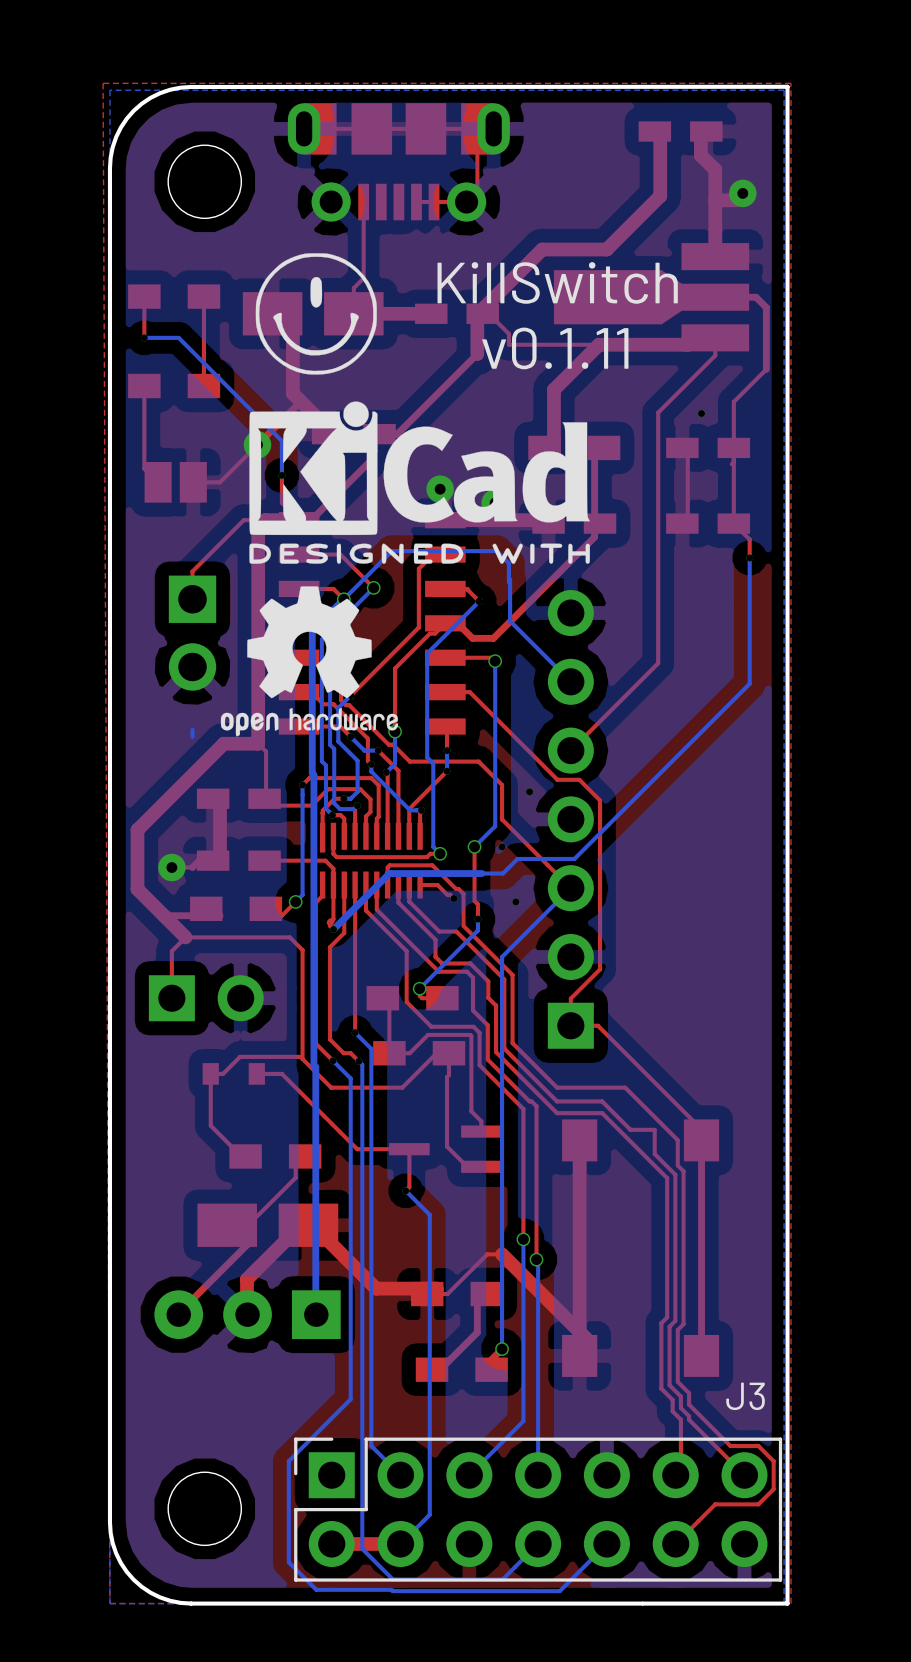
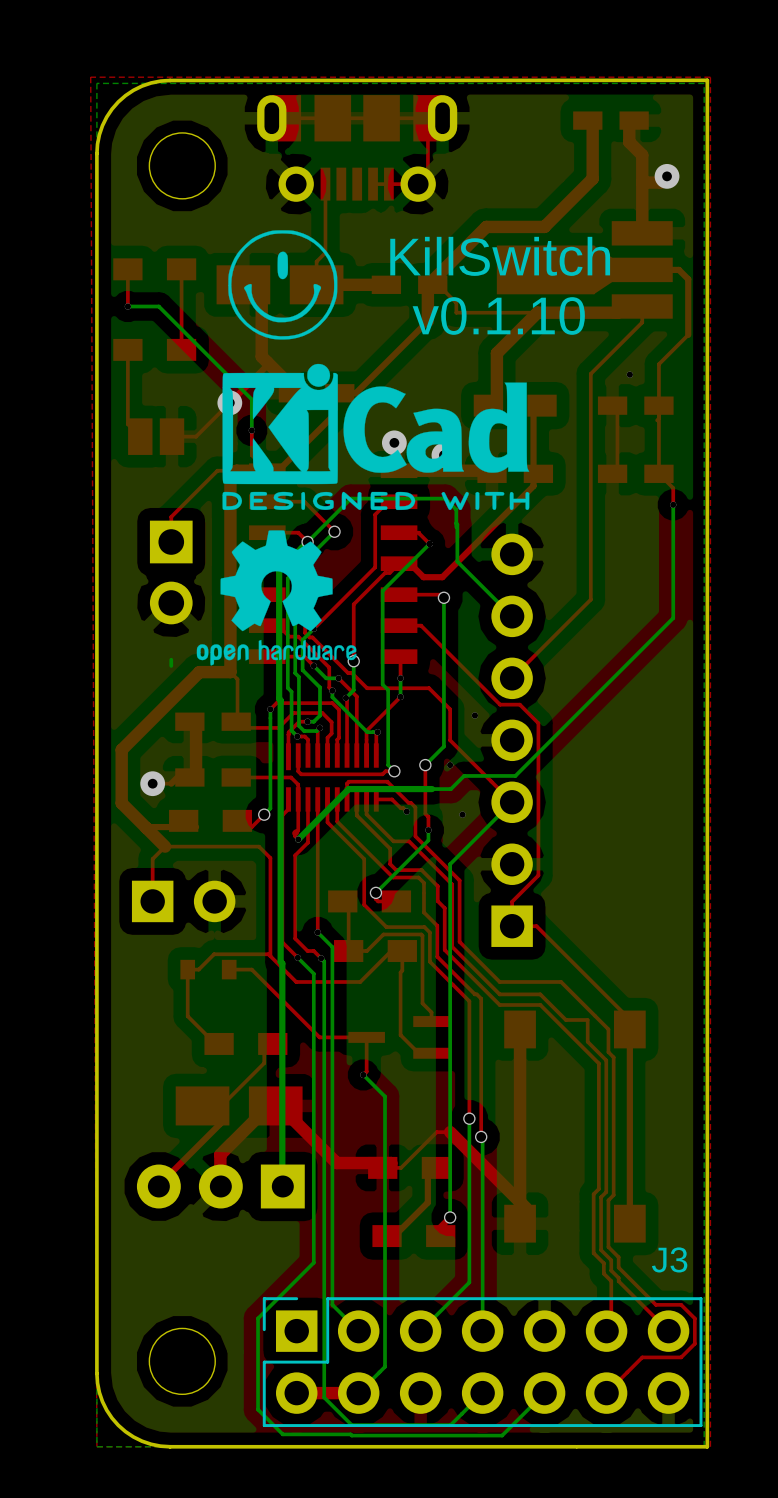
text: v0.1.11 (555, 348) -> v0.1.10 (498, 316)

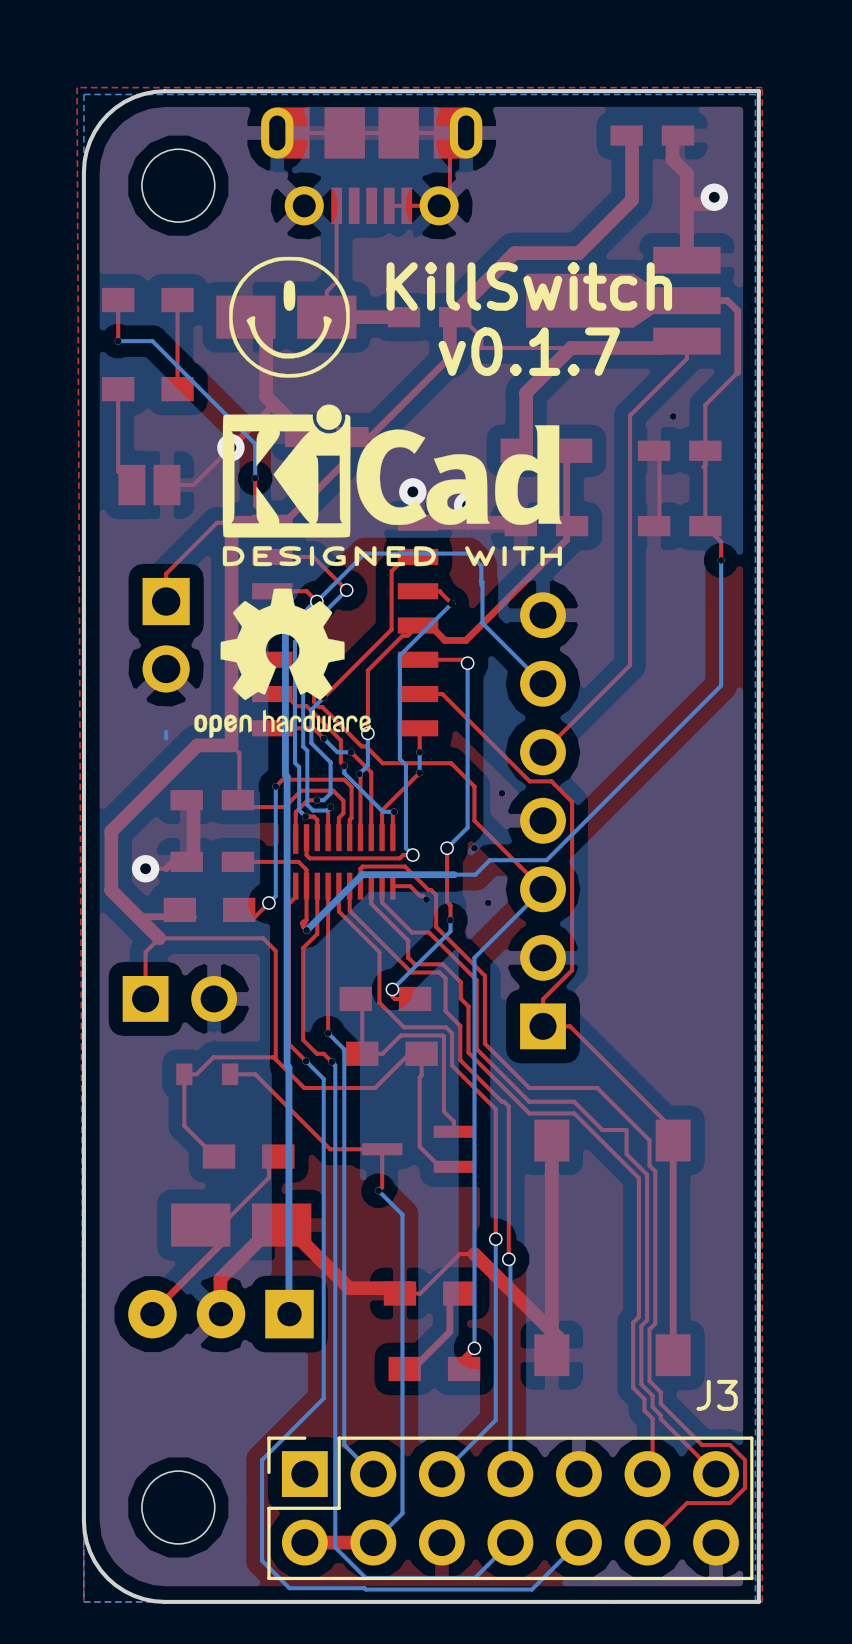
text: v0.1.10 (498, 316) -> v0.1.7 (529, 351)

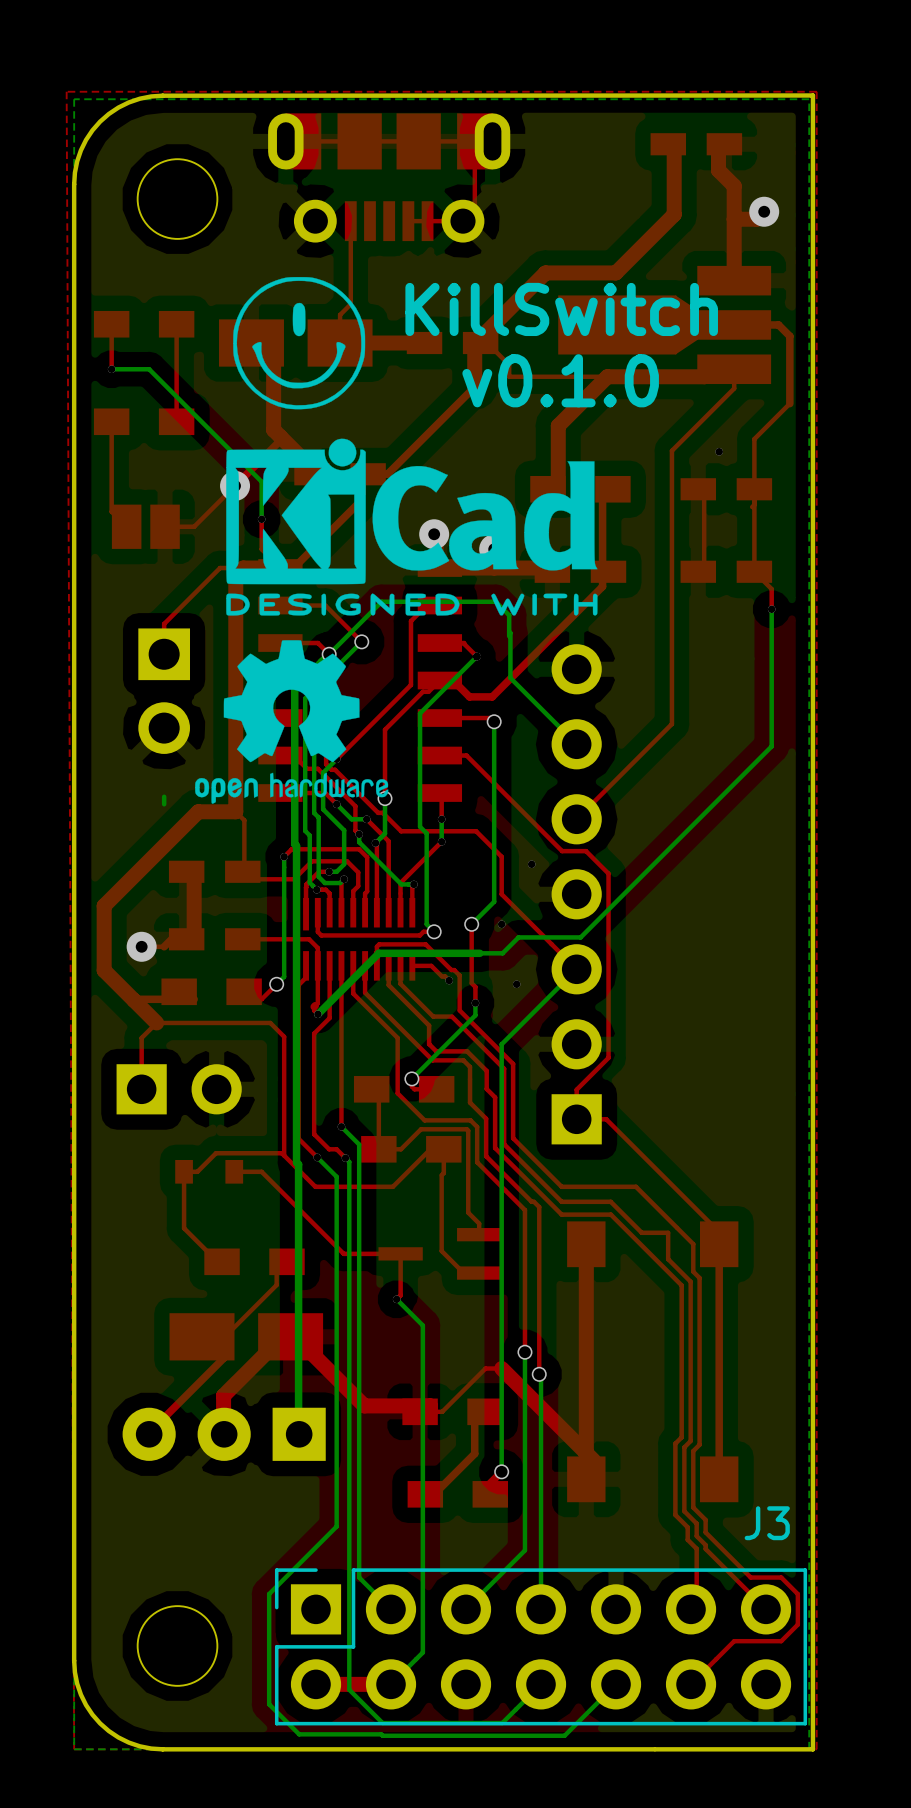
text: v0.1.7 (529, 351) -> v0.1.0 (560, 380)

